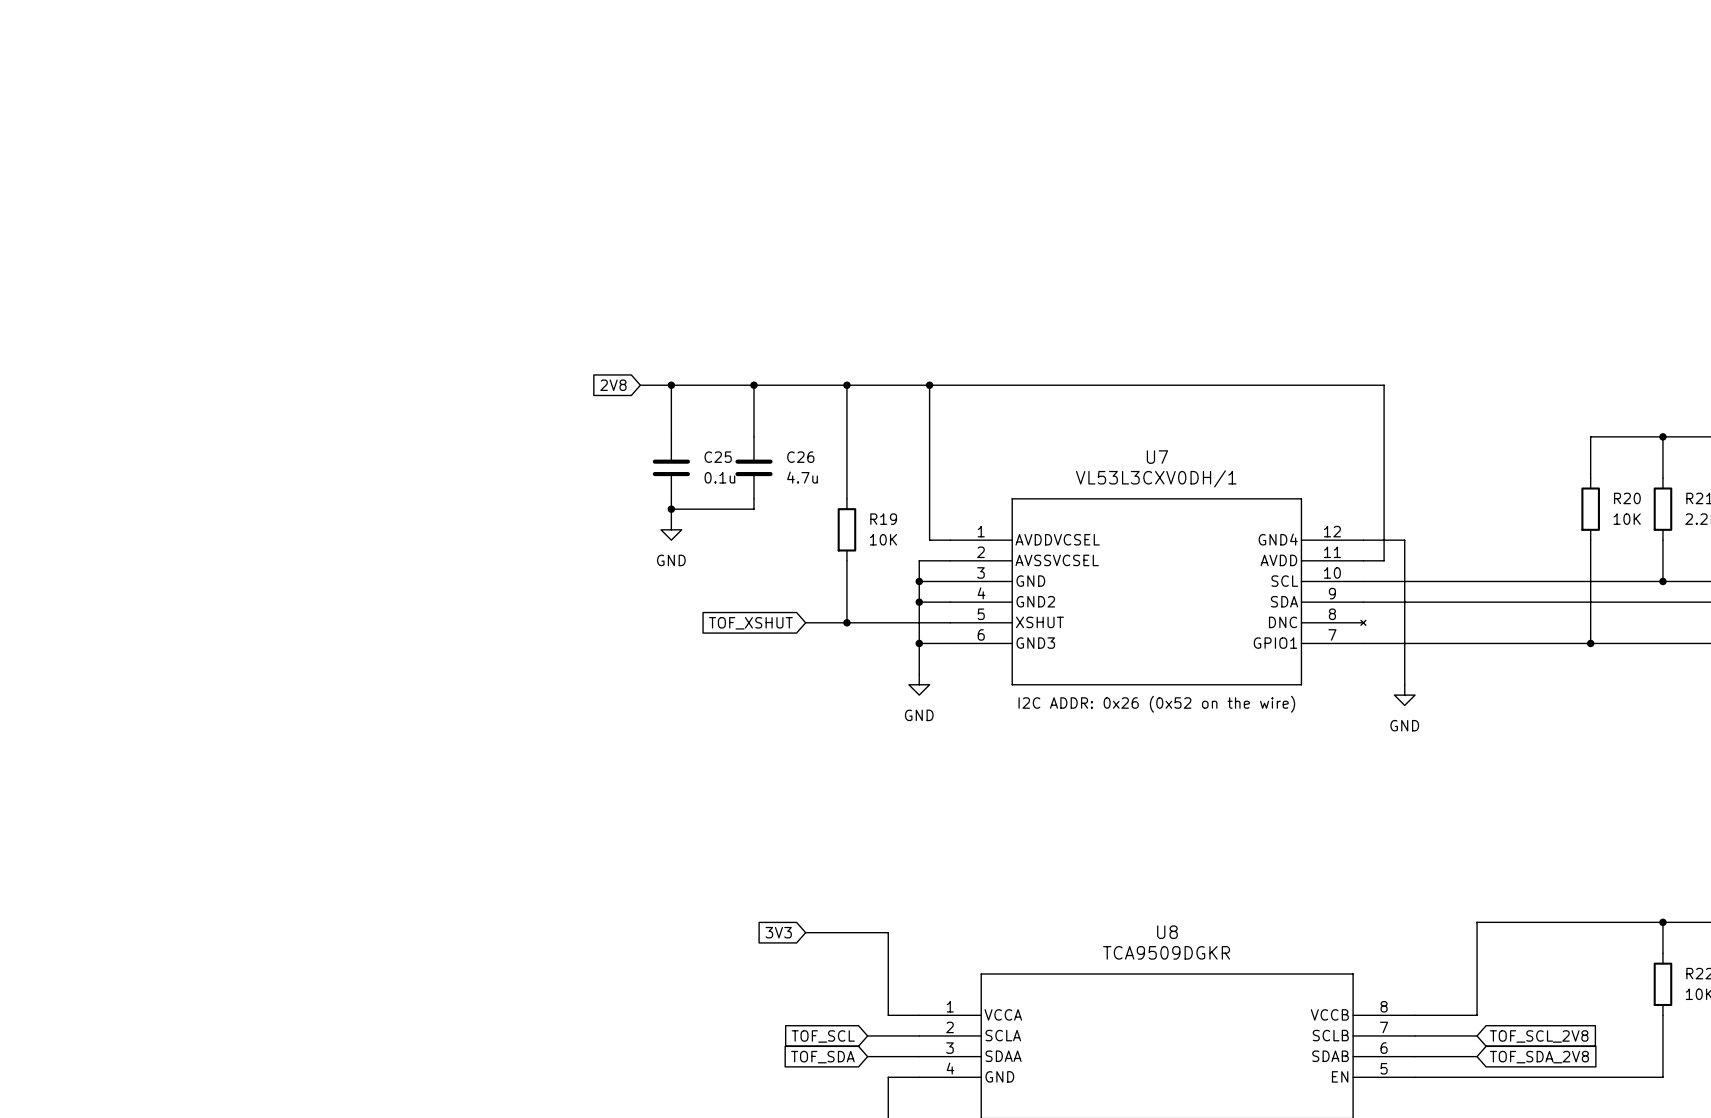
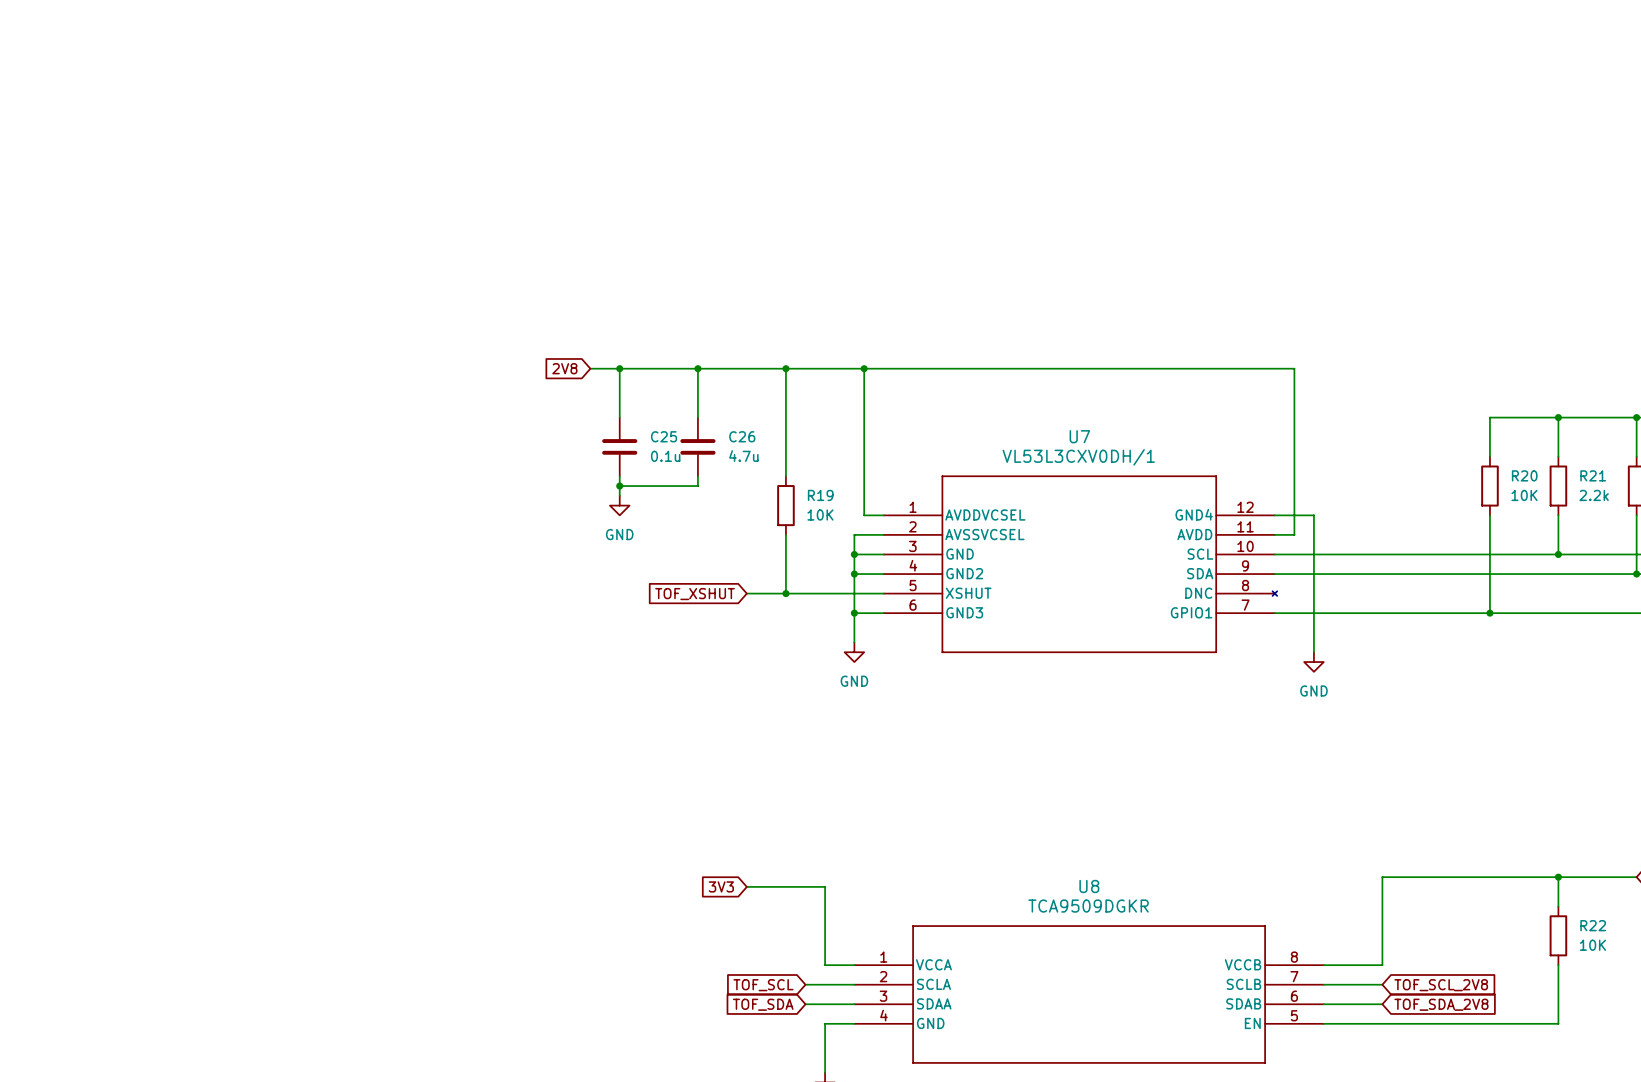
text: I2C ADDR: 0x26 (0x52 on the wire) (1156, 704) -> none

